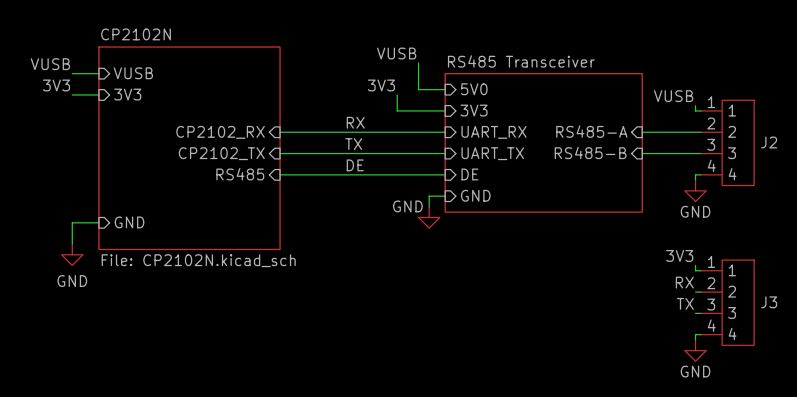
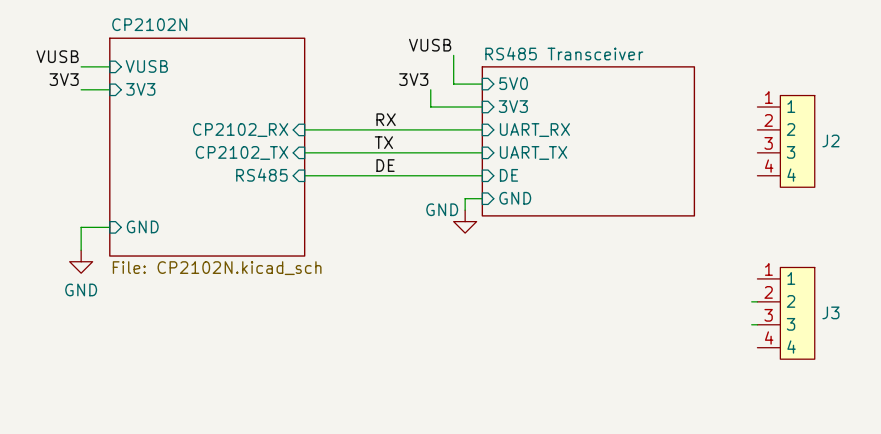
label: VUSB (673, 96) -> none
wire: (695, 105) (695, 110) (700, 110) -> none
sheet pin: RS485-A (591, 131) -> none
wire: (642, 132) (700, 132) -> none
sheet pin: RS485-B (590, 152) -> none
wire: (642, 153) (700, 153) -> none
wire: (700, 174) (695, 174) (695, 180) -> none
power symbol: GND (695, 190) -> none
label: 3V3 (679, 255) -> none
wire: (695, 265) (695, 270) (700, 270) -> none
label: RX (684, 282) -> none
label: TX (685, 303) -> none
wire: (700, 334) (695, 334) (695, 340) -> none
power symbol: GND (695, 350) -> none

